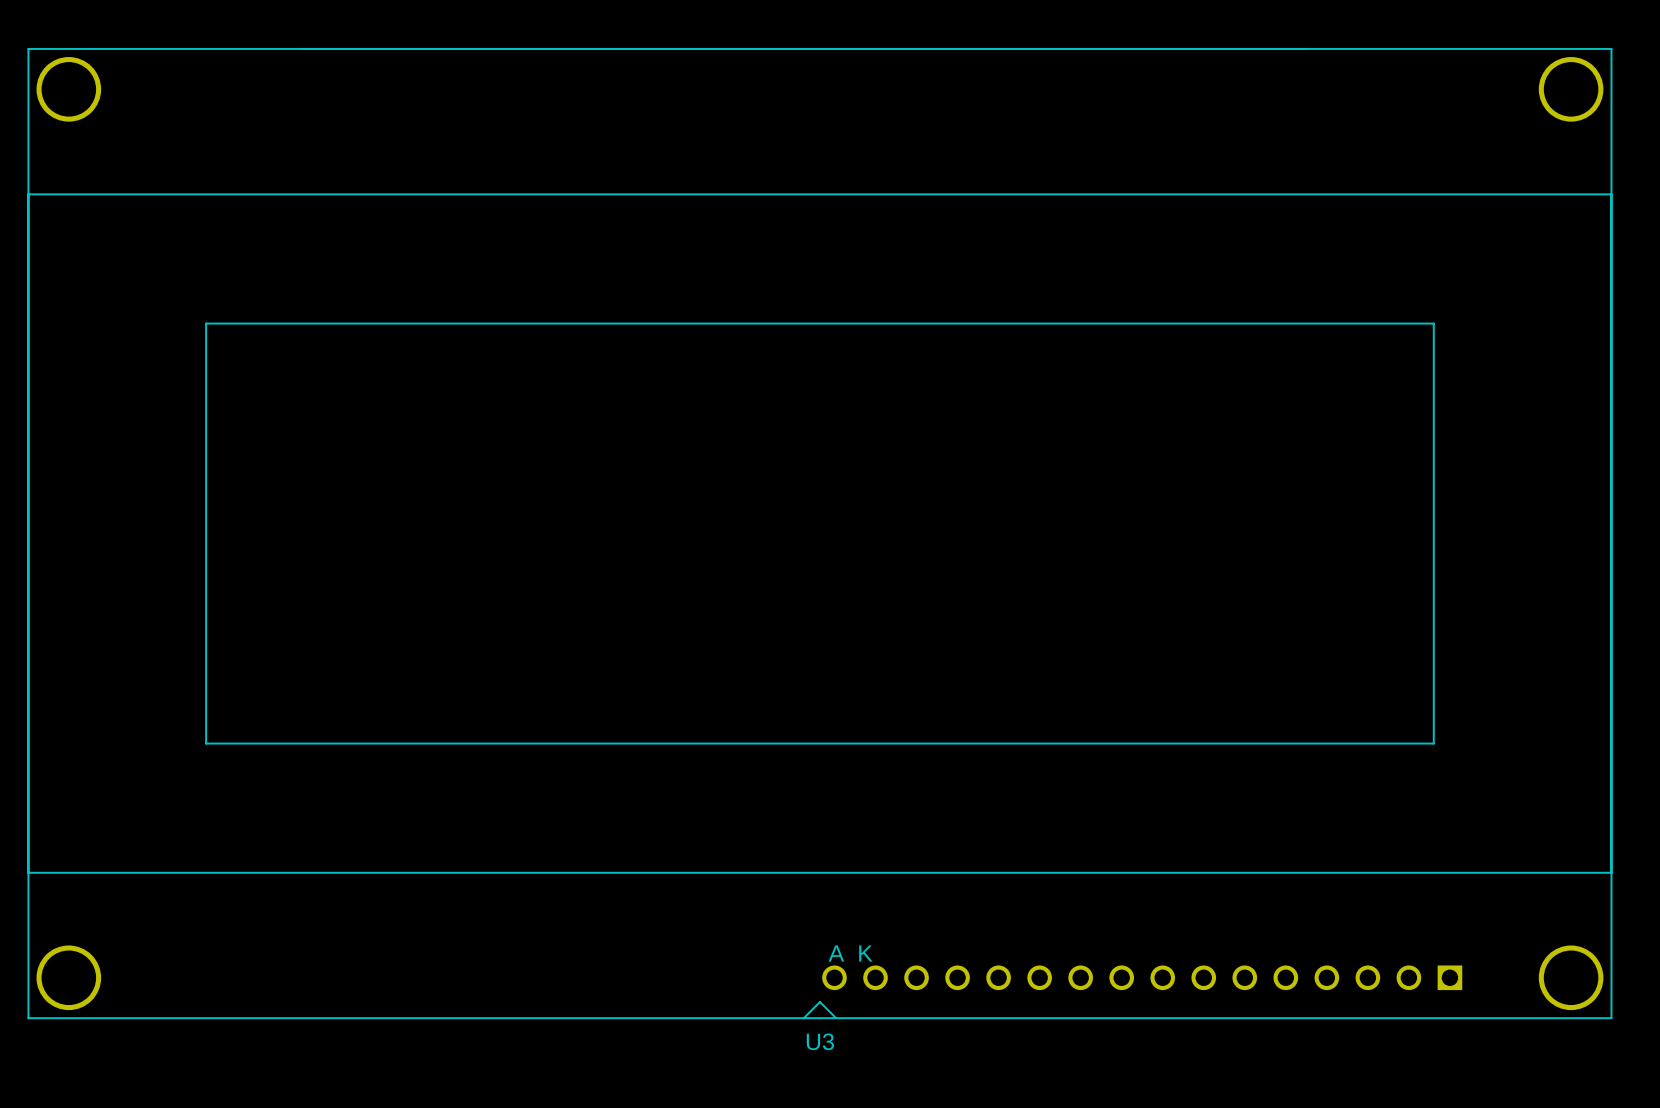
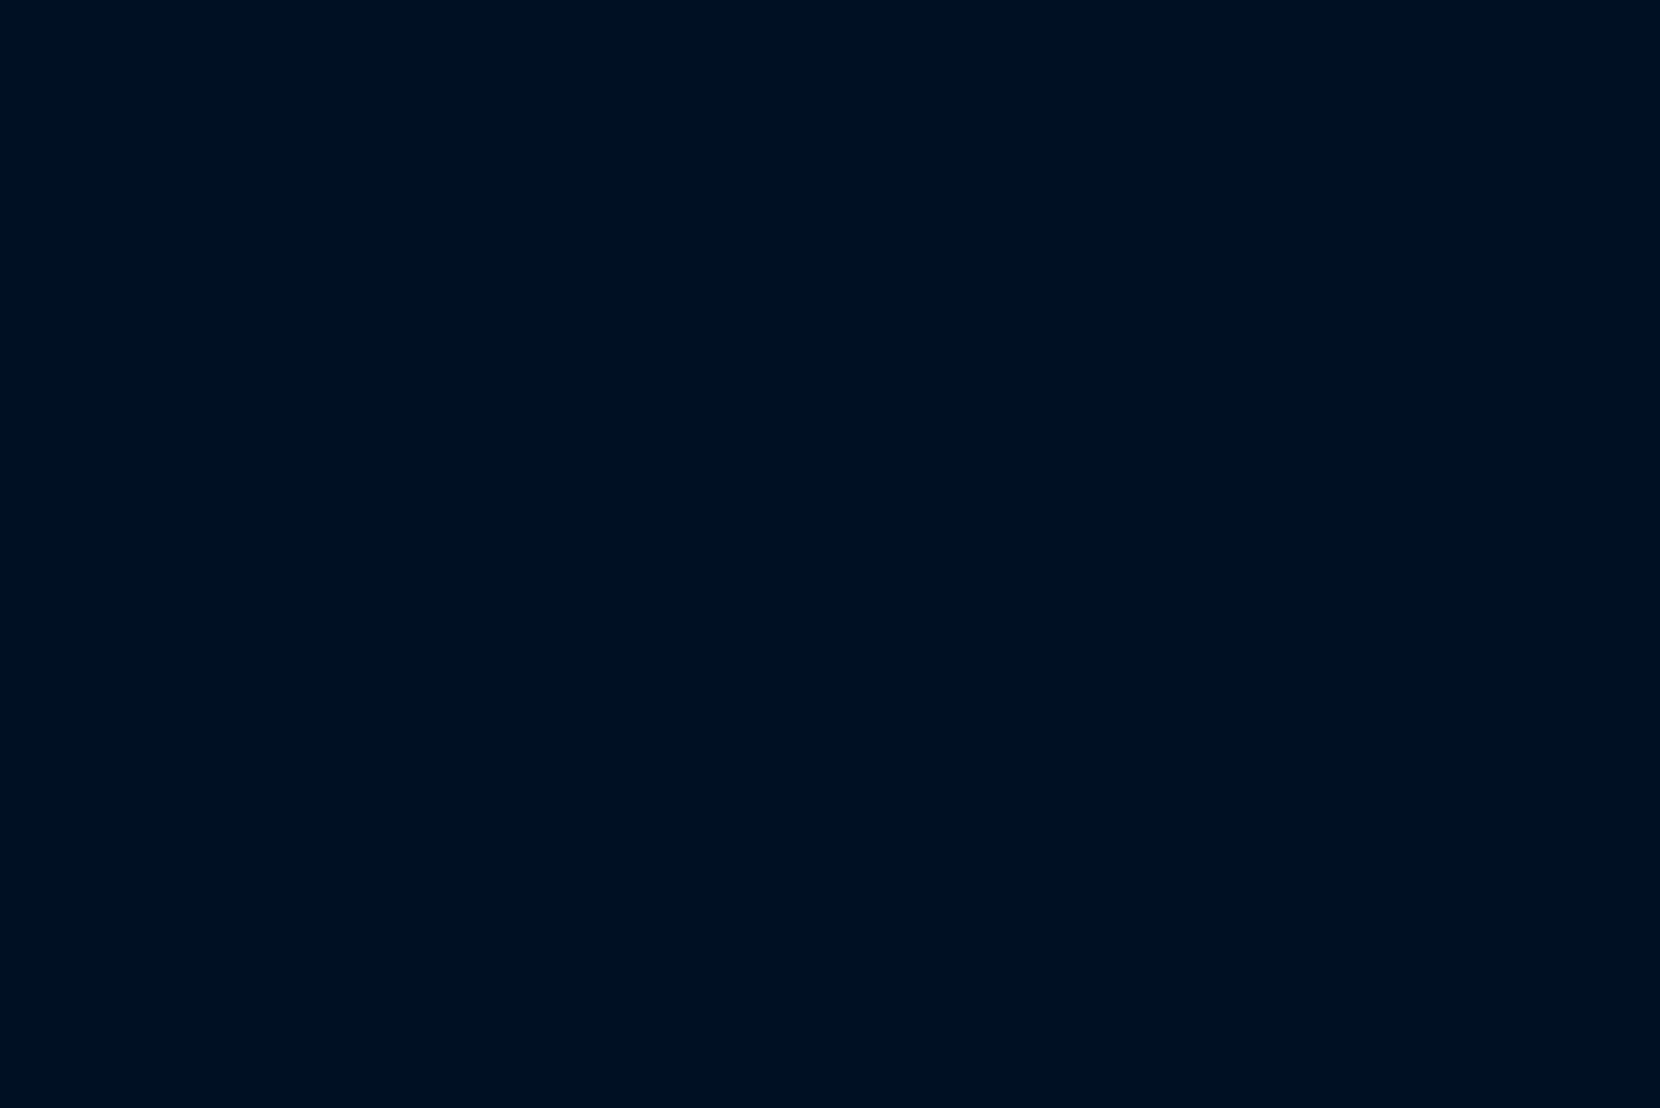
U3: (819, 533) -> none

